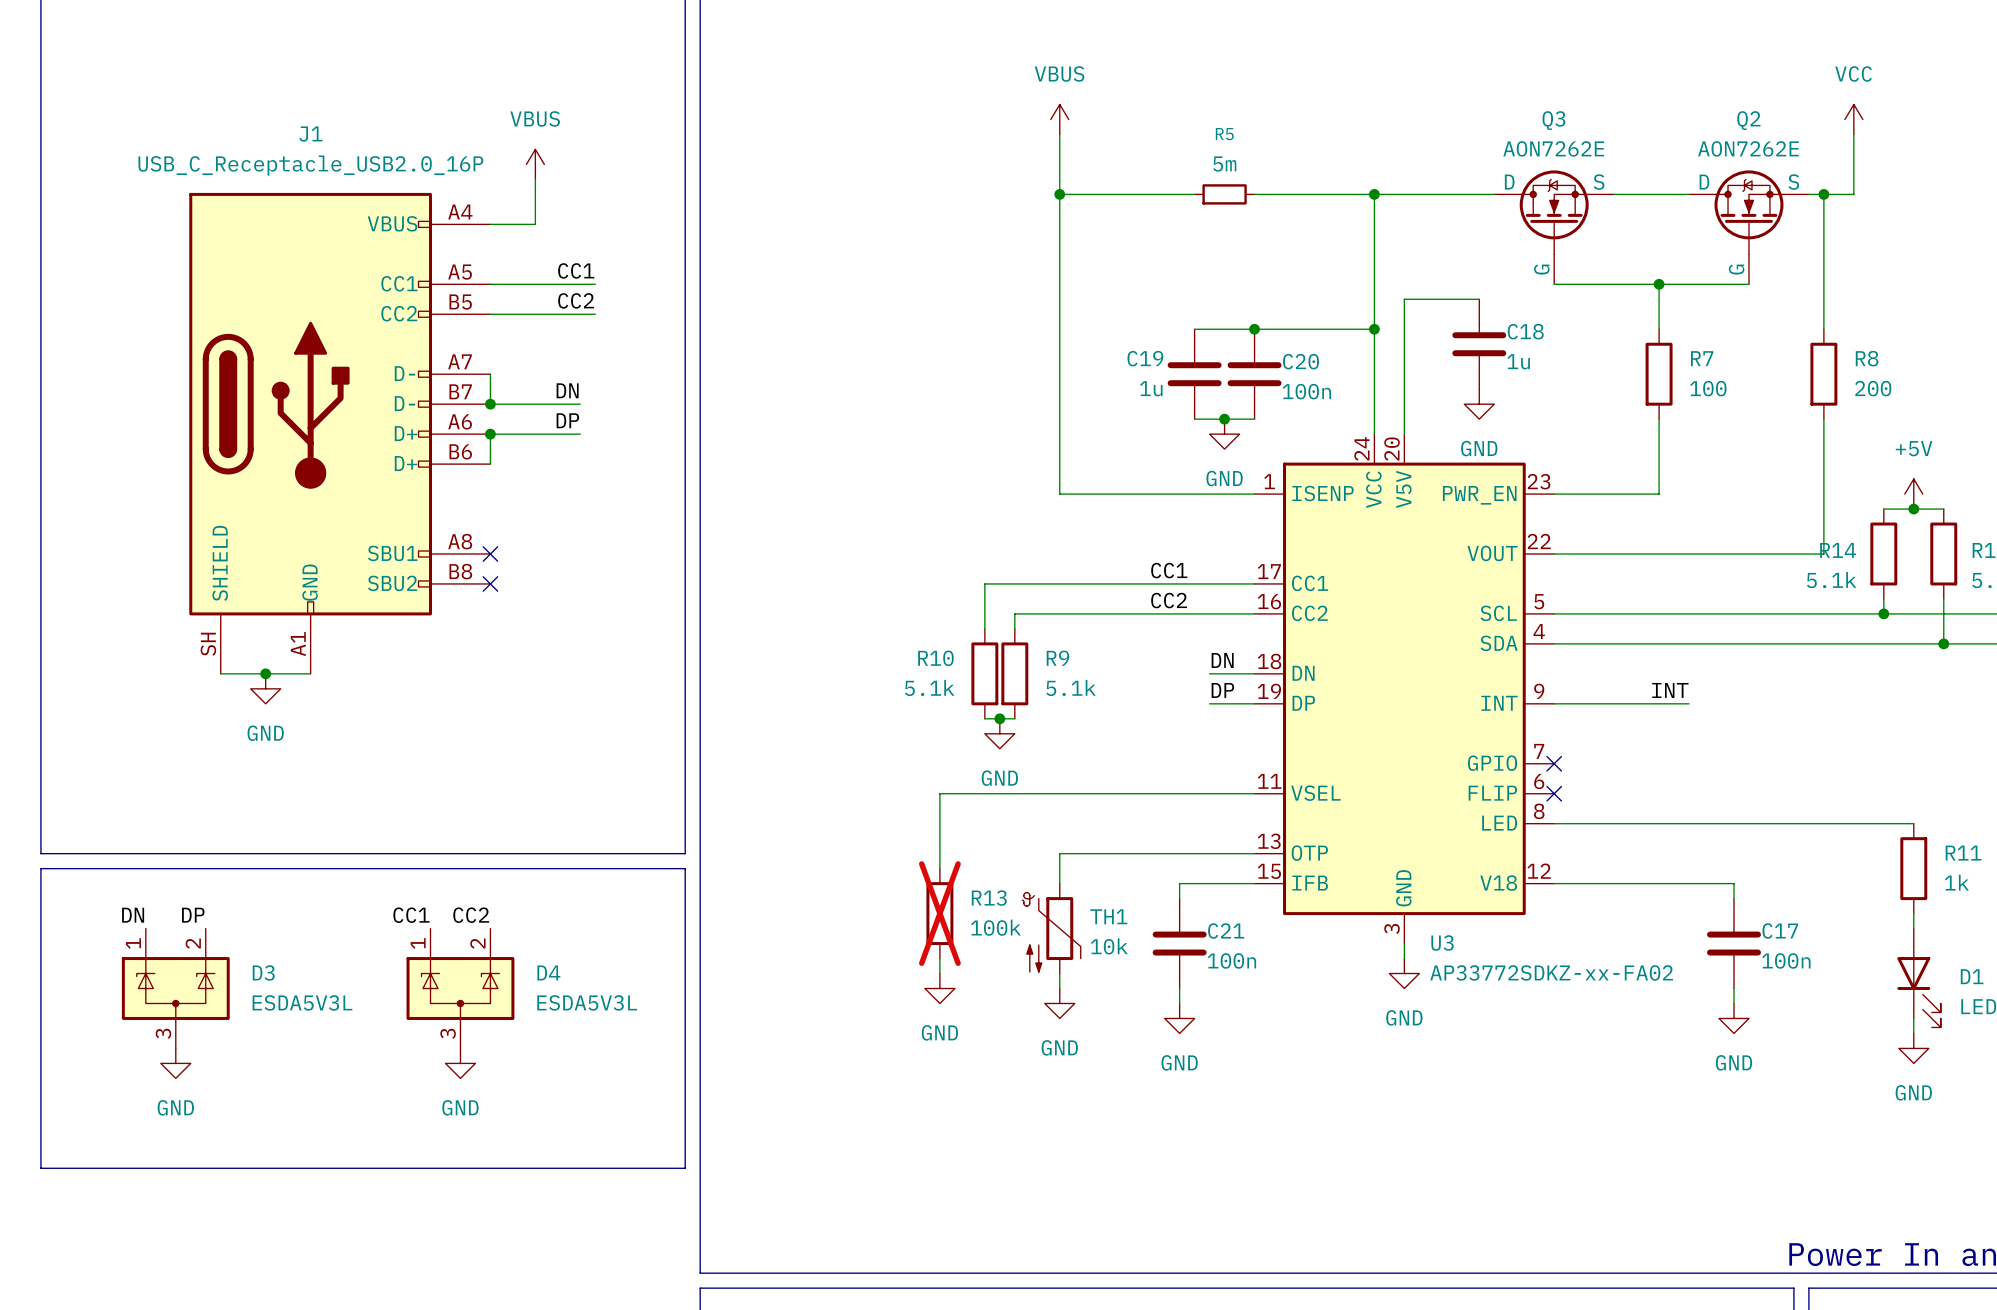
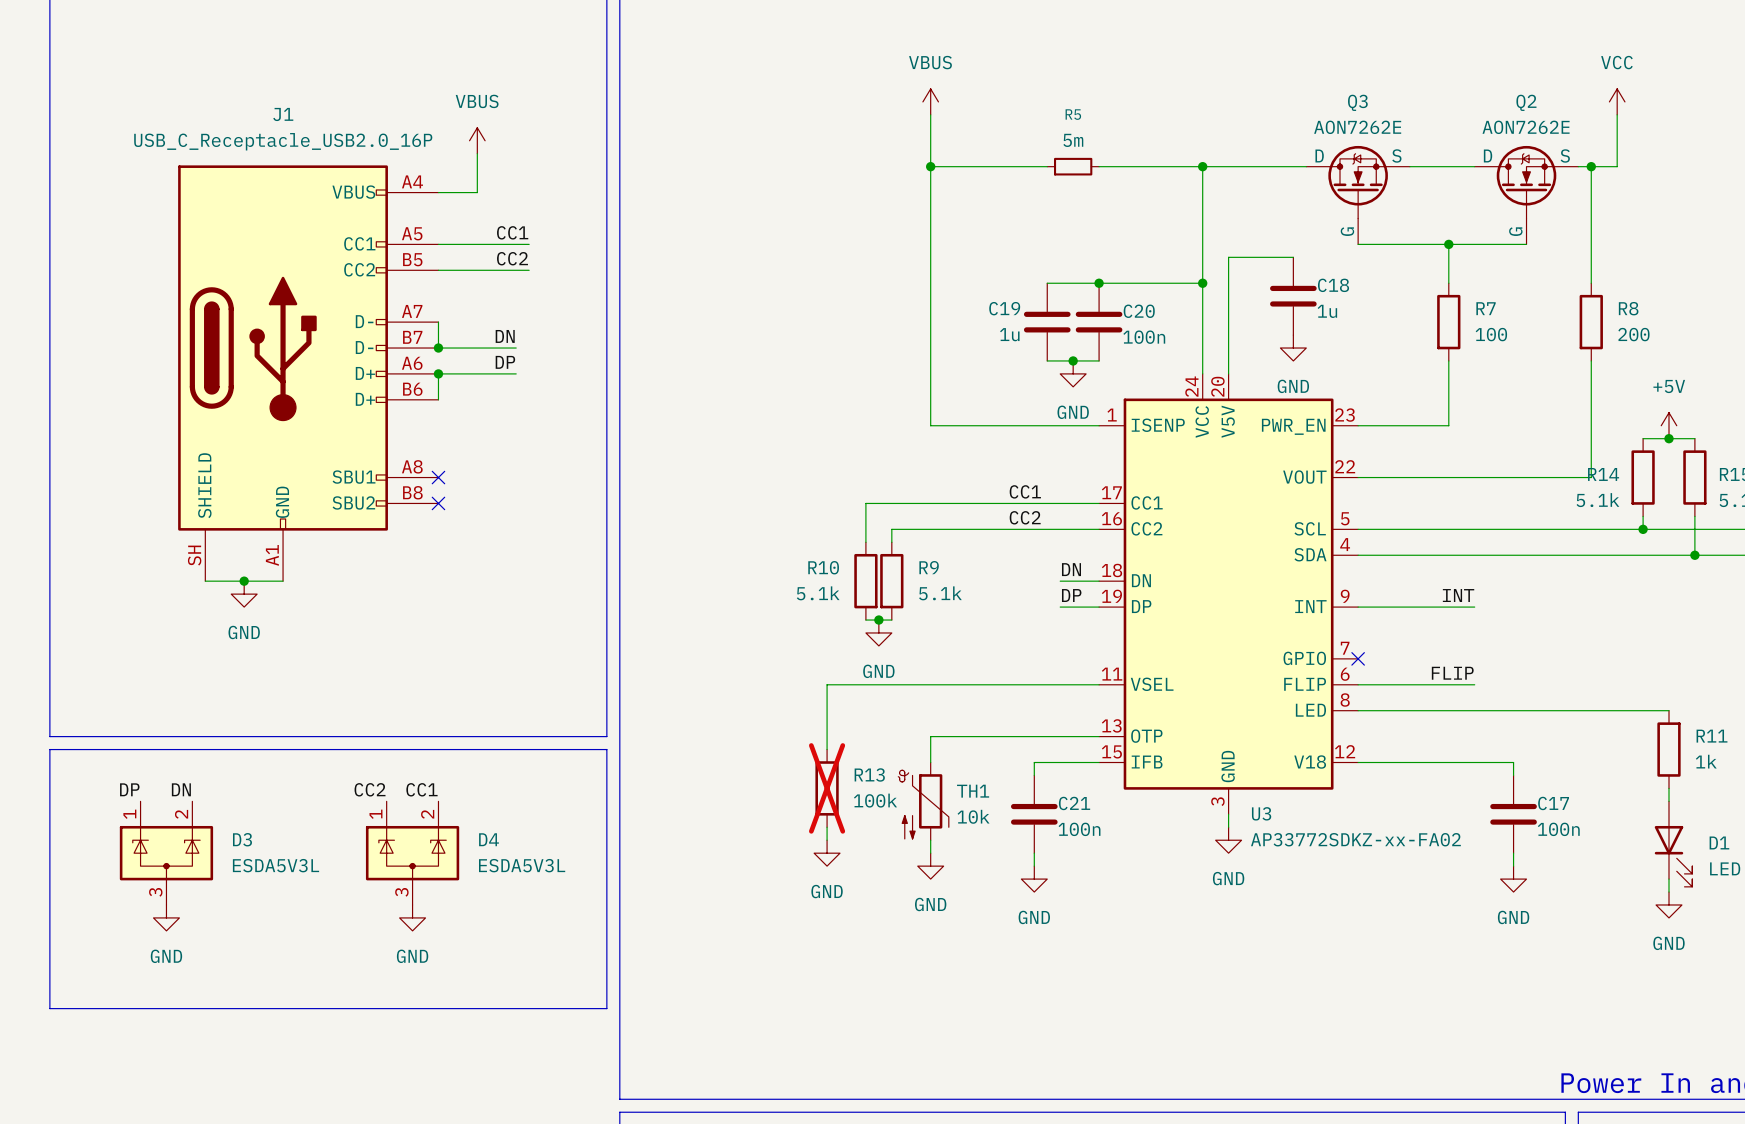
label: none -> FLIP (1452, 673)
wire: none -> (1358, 684) (1474, 684)
no-connect mark: (1554, 793) -> none
label: DN (133, 915) -> DP (129, 789)
label: DP (193, 915) -> DN (181, 789)
label: CC1 (411, 915) -> CC2 (370, 789)
label: CC2 (471, 915) -> CC1 (421, 789)

